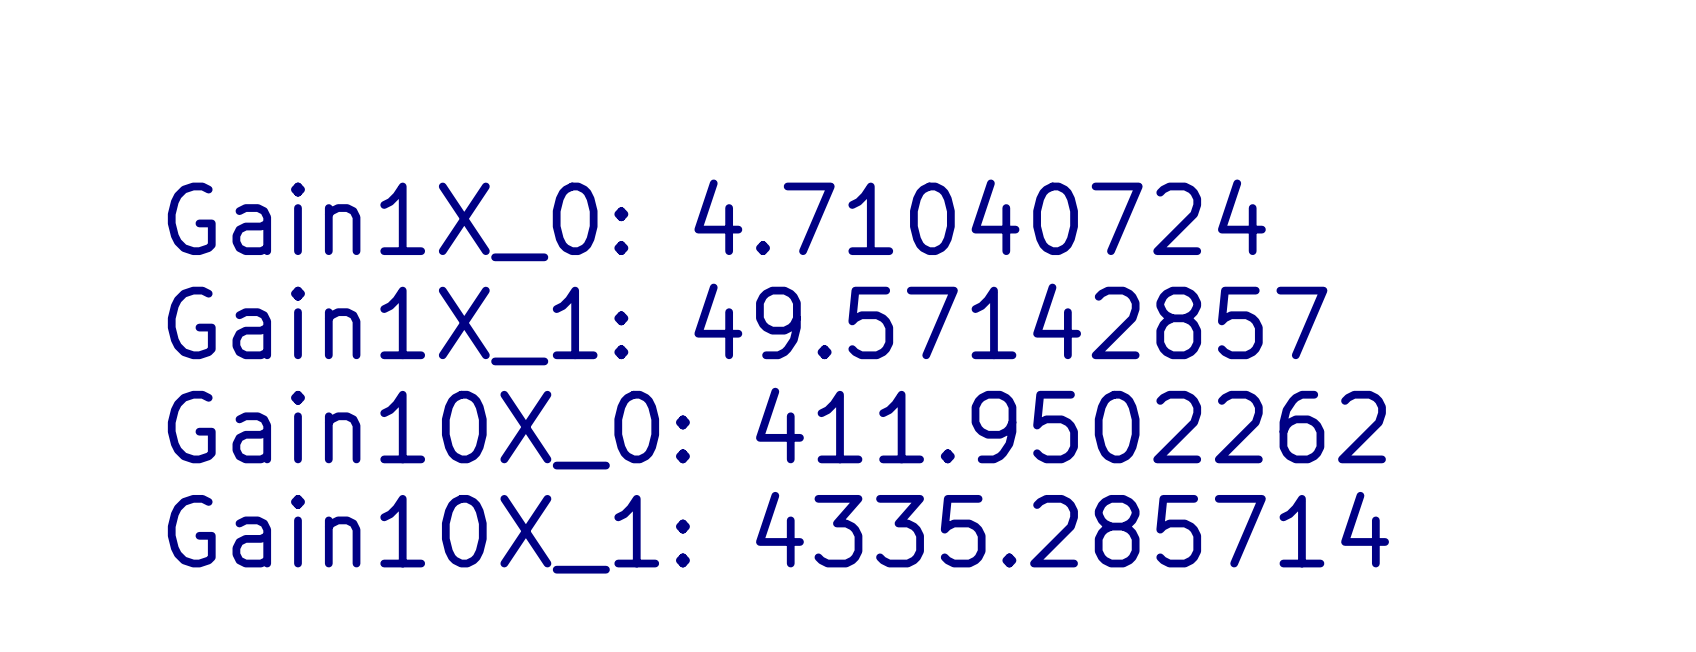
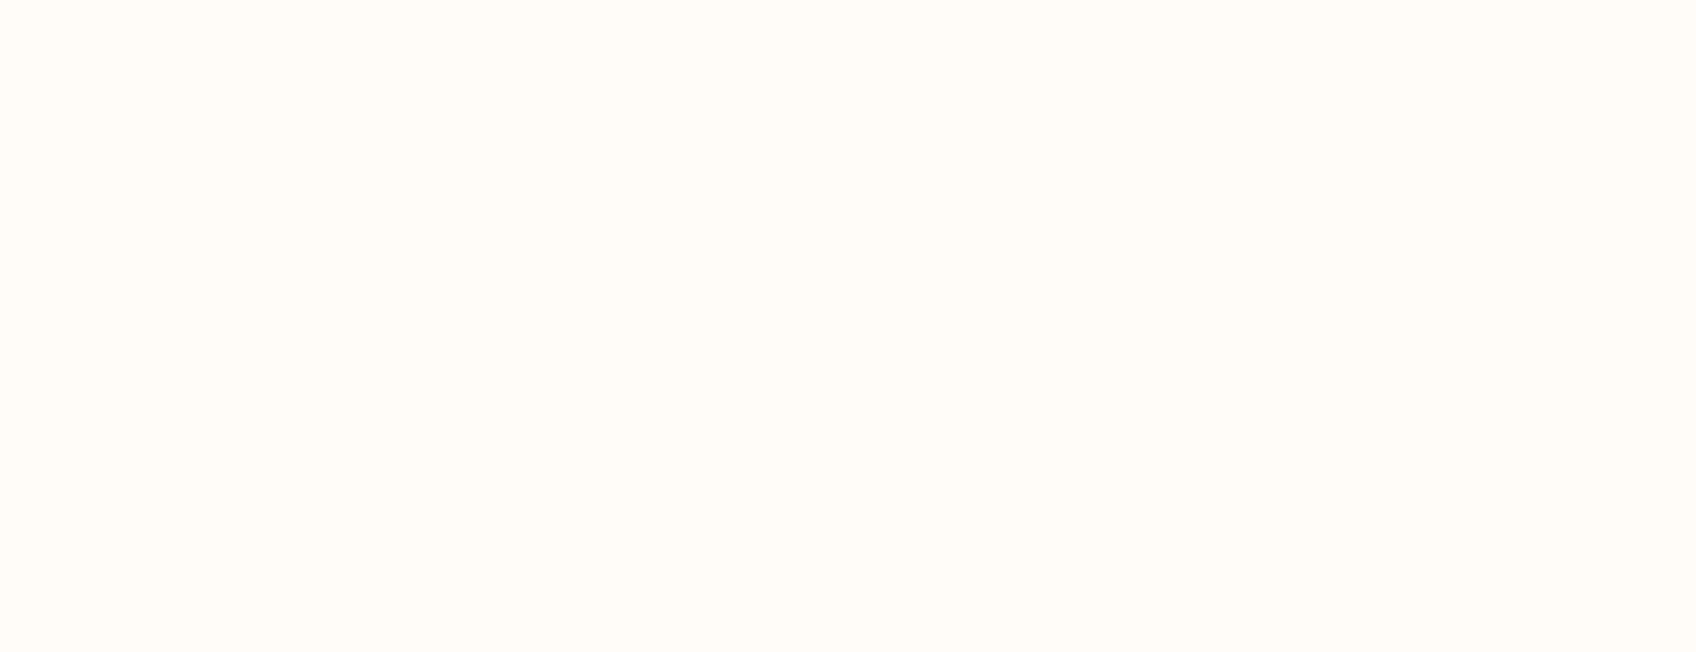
text: Gain1X_0: 4.71040724 (716, 220) -> none
text: Gain1X_1: 49.57142857 (747, 324) -> none
text: Gain10X_0: 411.9502262 (776, 428) -> none
text: Gain10X_1: 4335.285714 (778, 532) -> none

